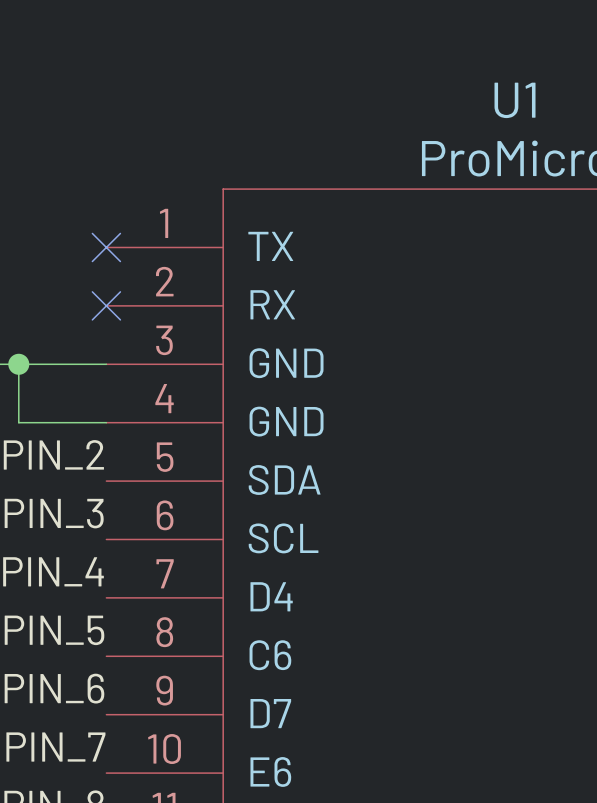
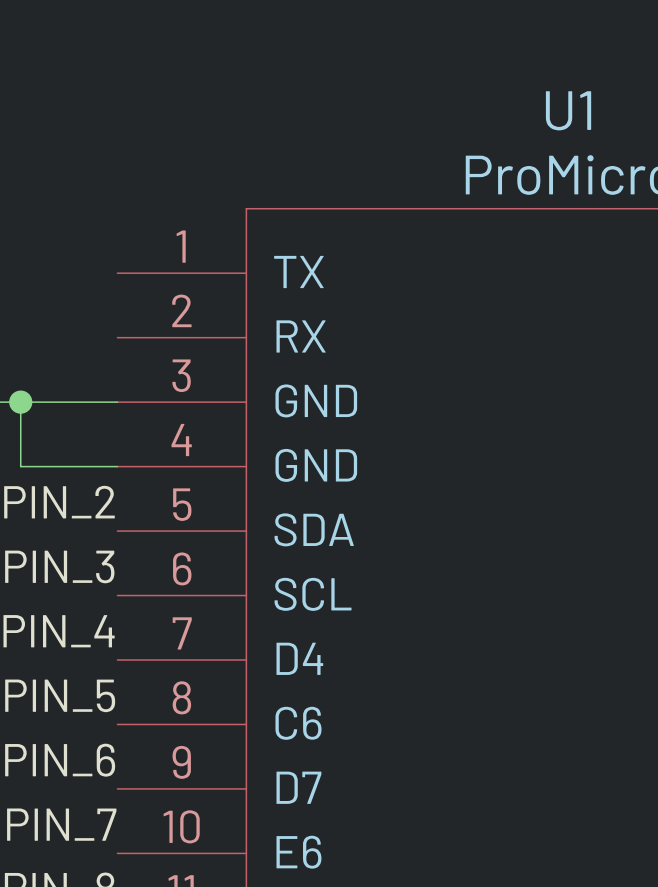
no-connect mark: (106, 247) -> none
no-connect mark: (106, 305) -> none

